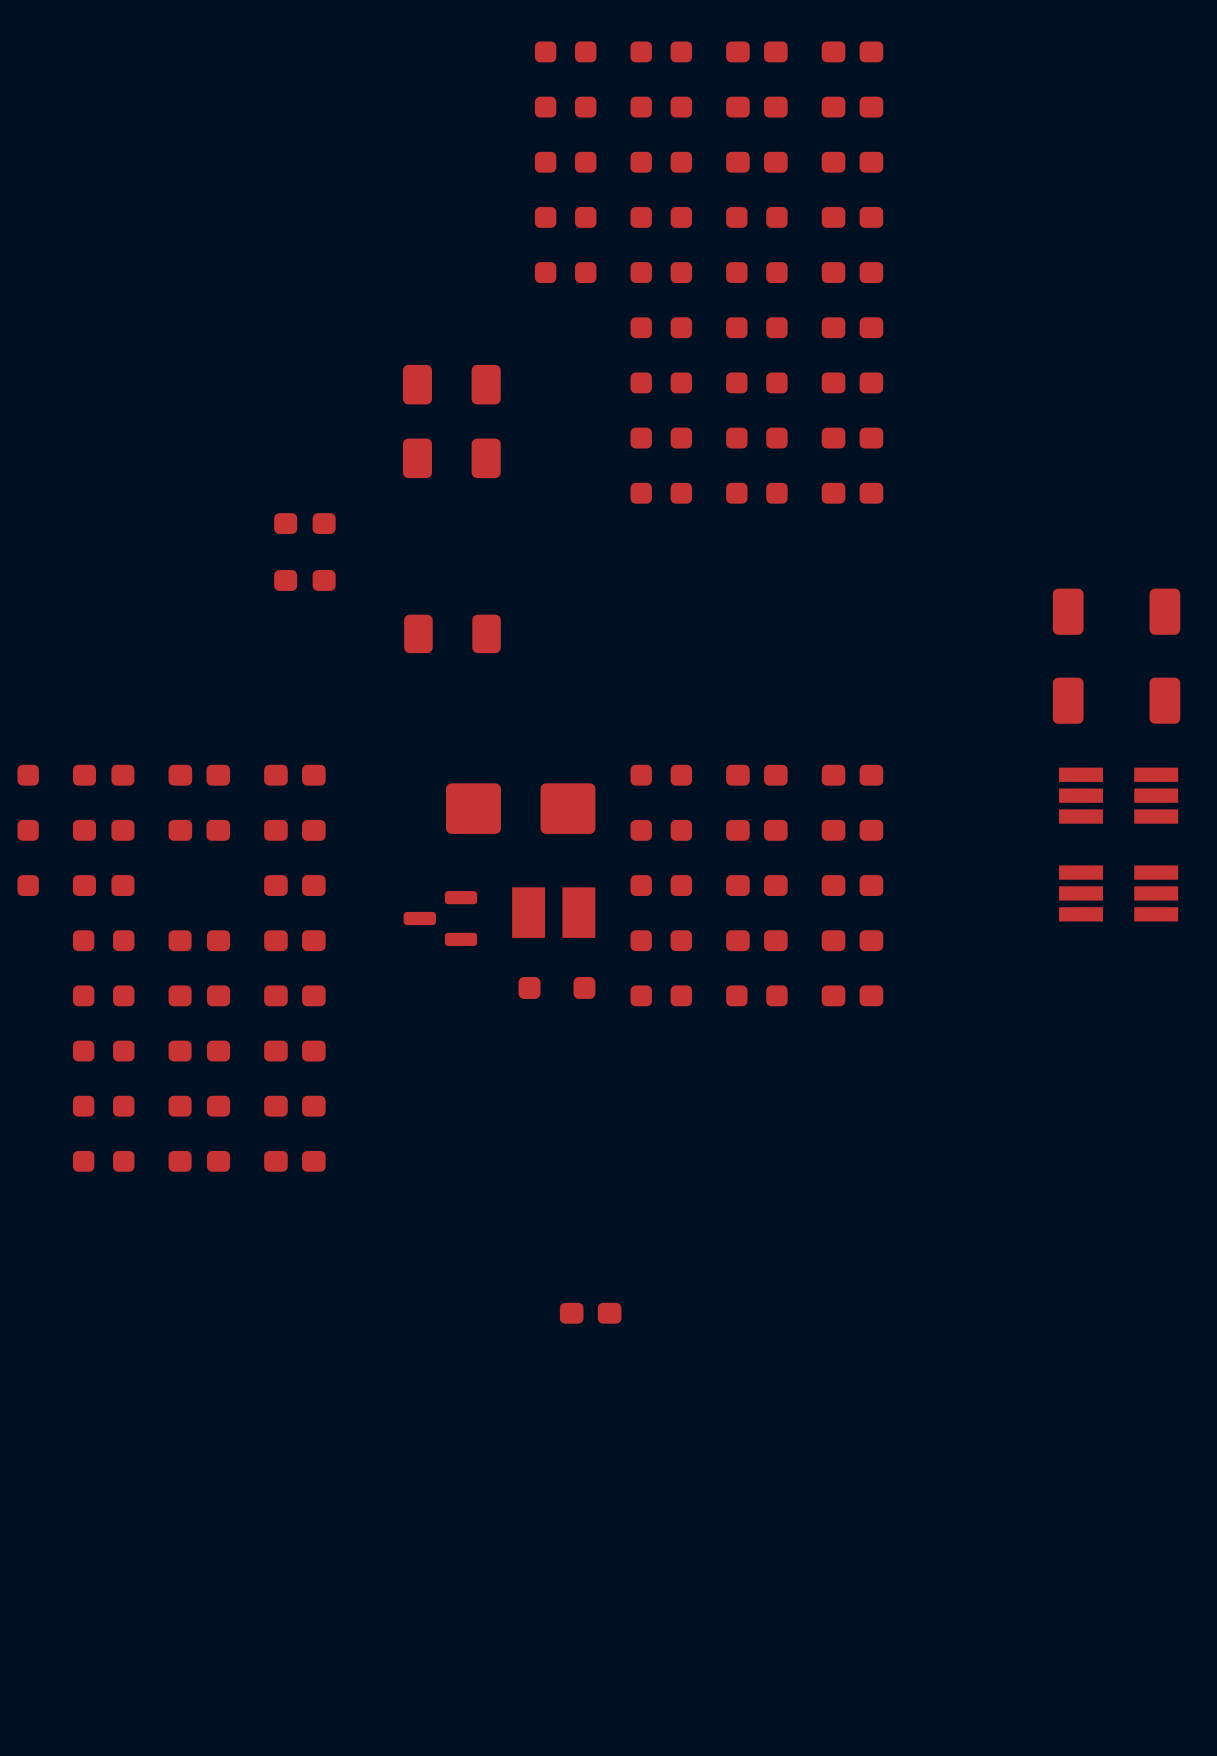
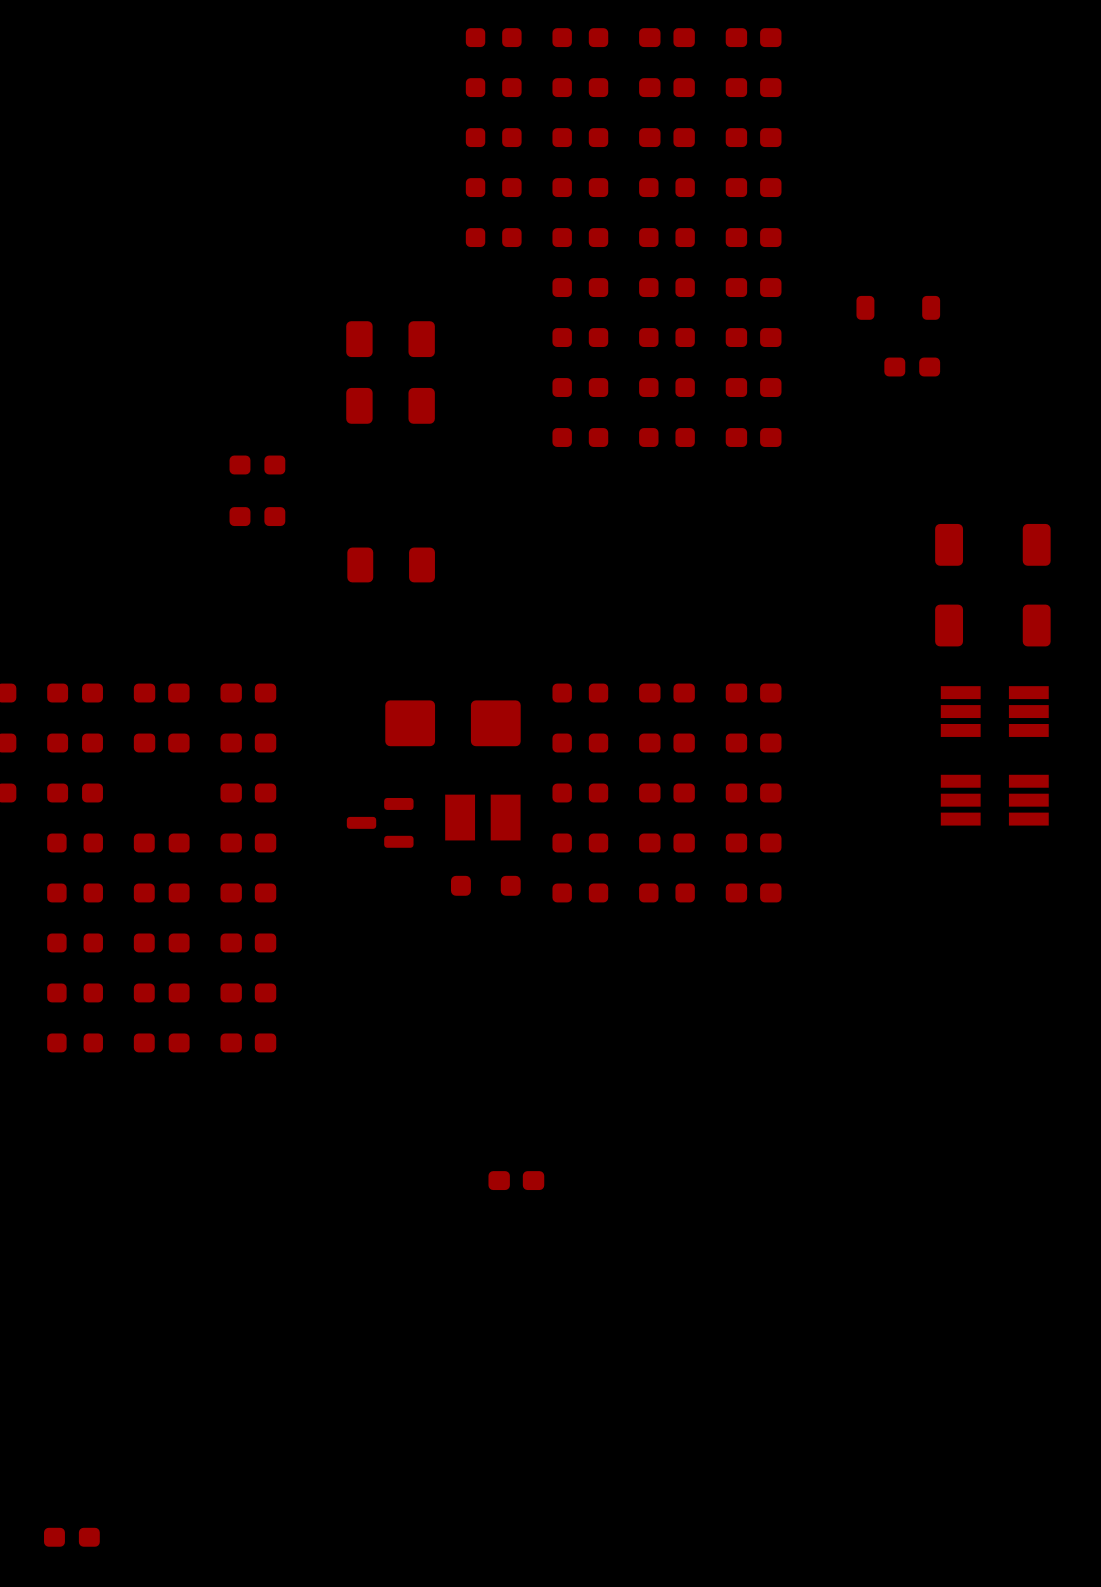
part: none -> (898, 307)
part: none -> (912, 367)
part: none -> (71, 1537)

